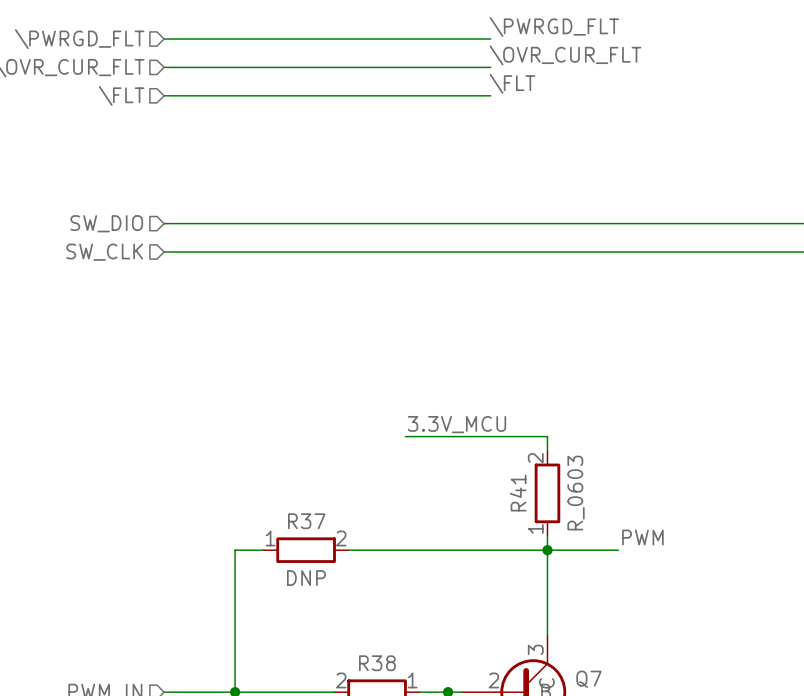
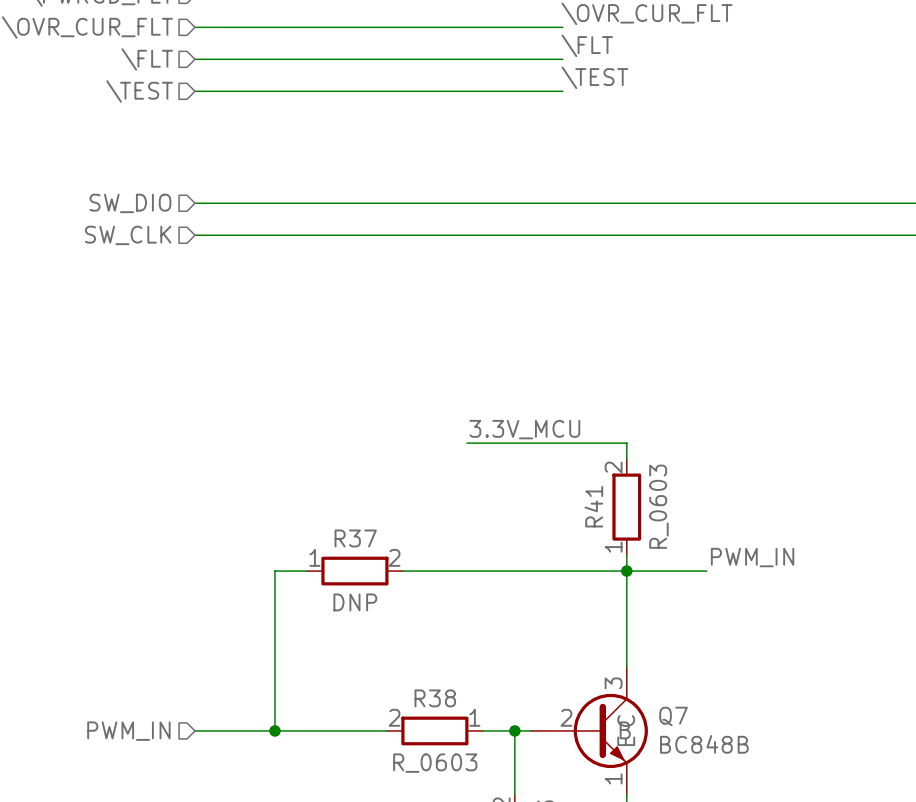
label: none -> \TEST (594, 77)
hierarchical label: none -> \TEST (139, 91)
wire: none -> (195, 91) (562, 91)
label: PWM (642, 537) -> PWM_IN (752, 557)

